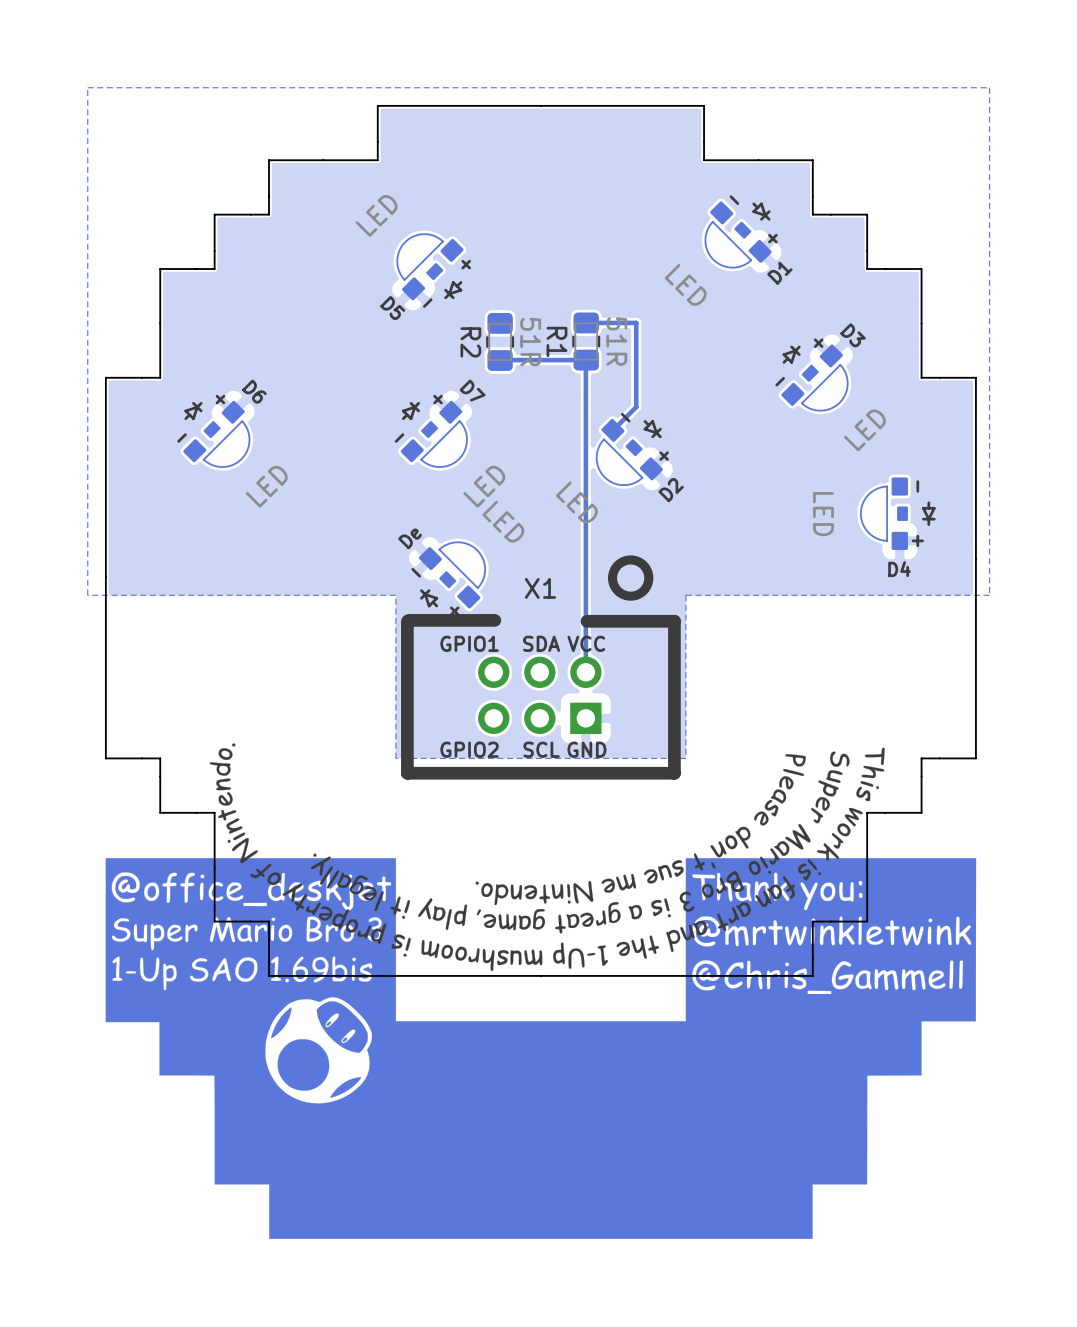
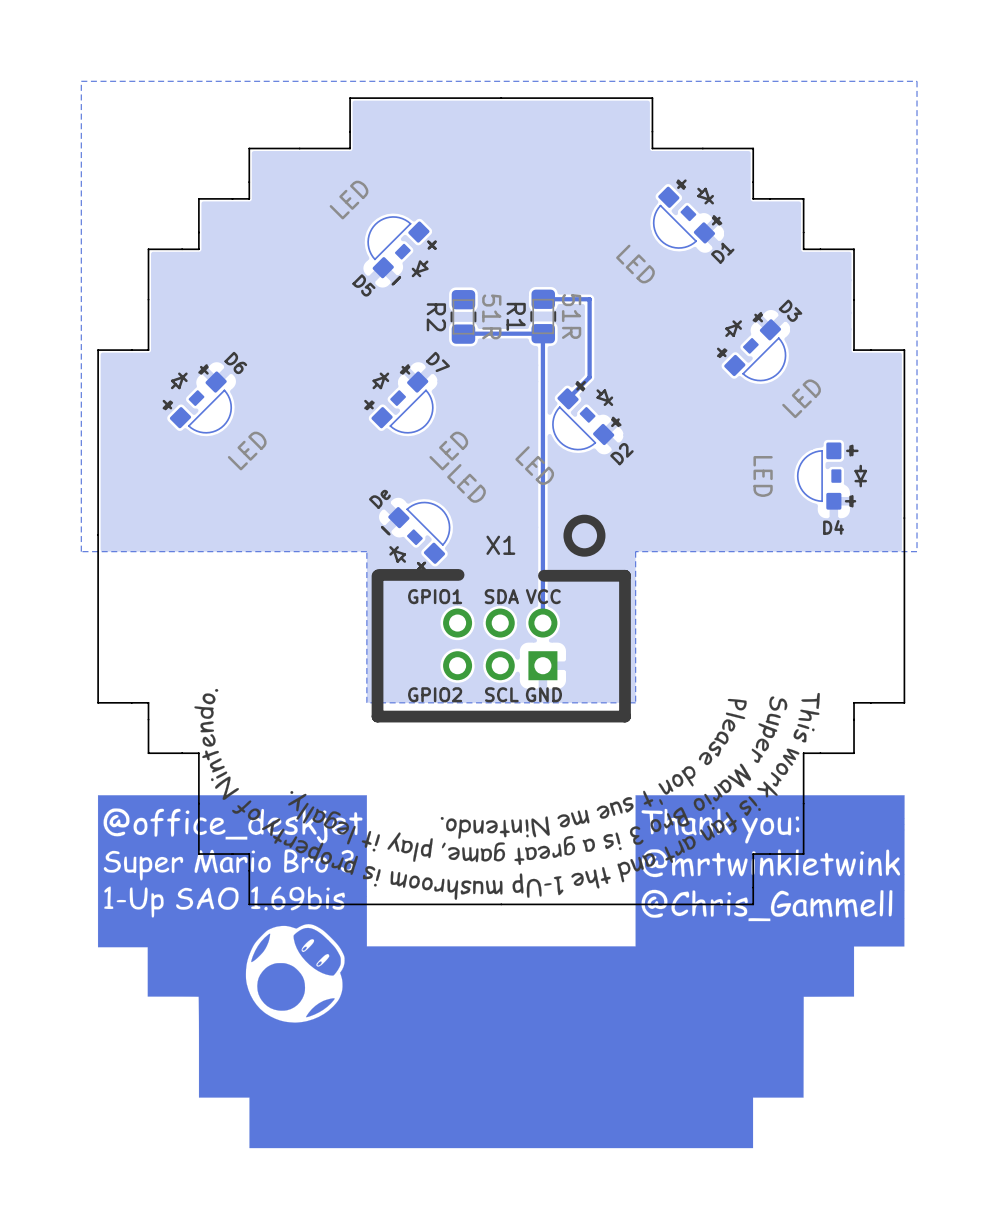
D1 footprint: [704, 201, 772, 269] -> [652, 179, 723, 249]
D5 footprint: [396, 233, 464, 301] -> [367, 216, 437, 286]
D3 footprint: [781, 344, 849, 412] -> [716, 311, 787, 382]
D6 footprint: [183, 400, 251, 468] -> [162, 364, 233, 434]
D7 footprint: [400, 400, 468, 468] -> [364, 364, 434, 434]
D2 footprint: [595, 418, 663, 487] -> [552, 380, 622, 451]
D4 footprint: [859, 477, 936, 550] -> [796, 442, 868, 510]
De footprint: [418, 541, 487, 609] -> [380, 501, 451, 572]

